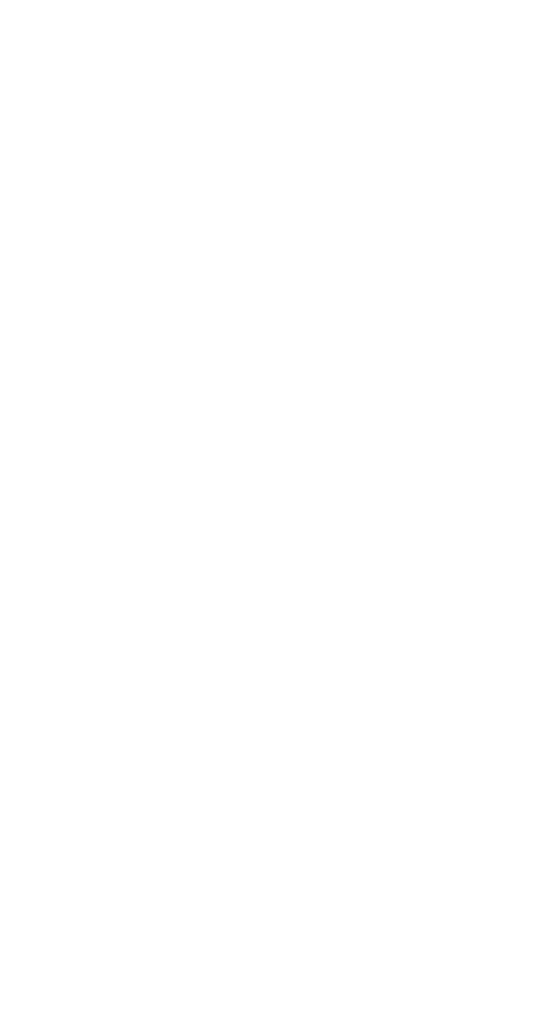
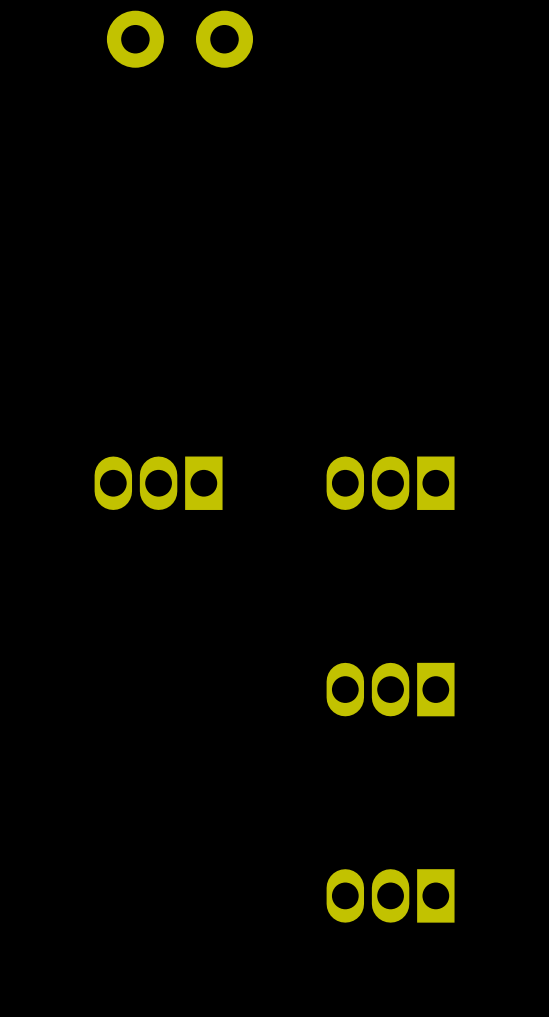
part: none -> (179, 39)
part: none -> (158, 483)
part: none -> (390, 483)
part: none -> (390, 689)
part: none -> (390, 895)

